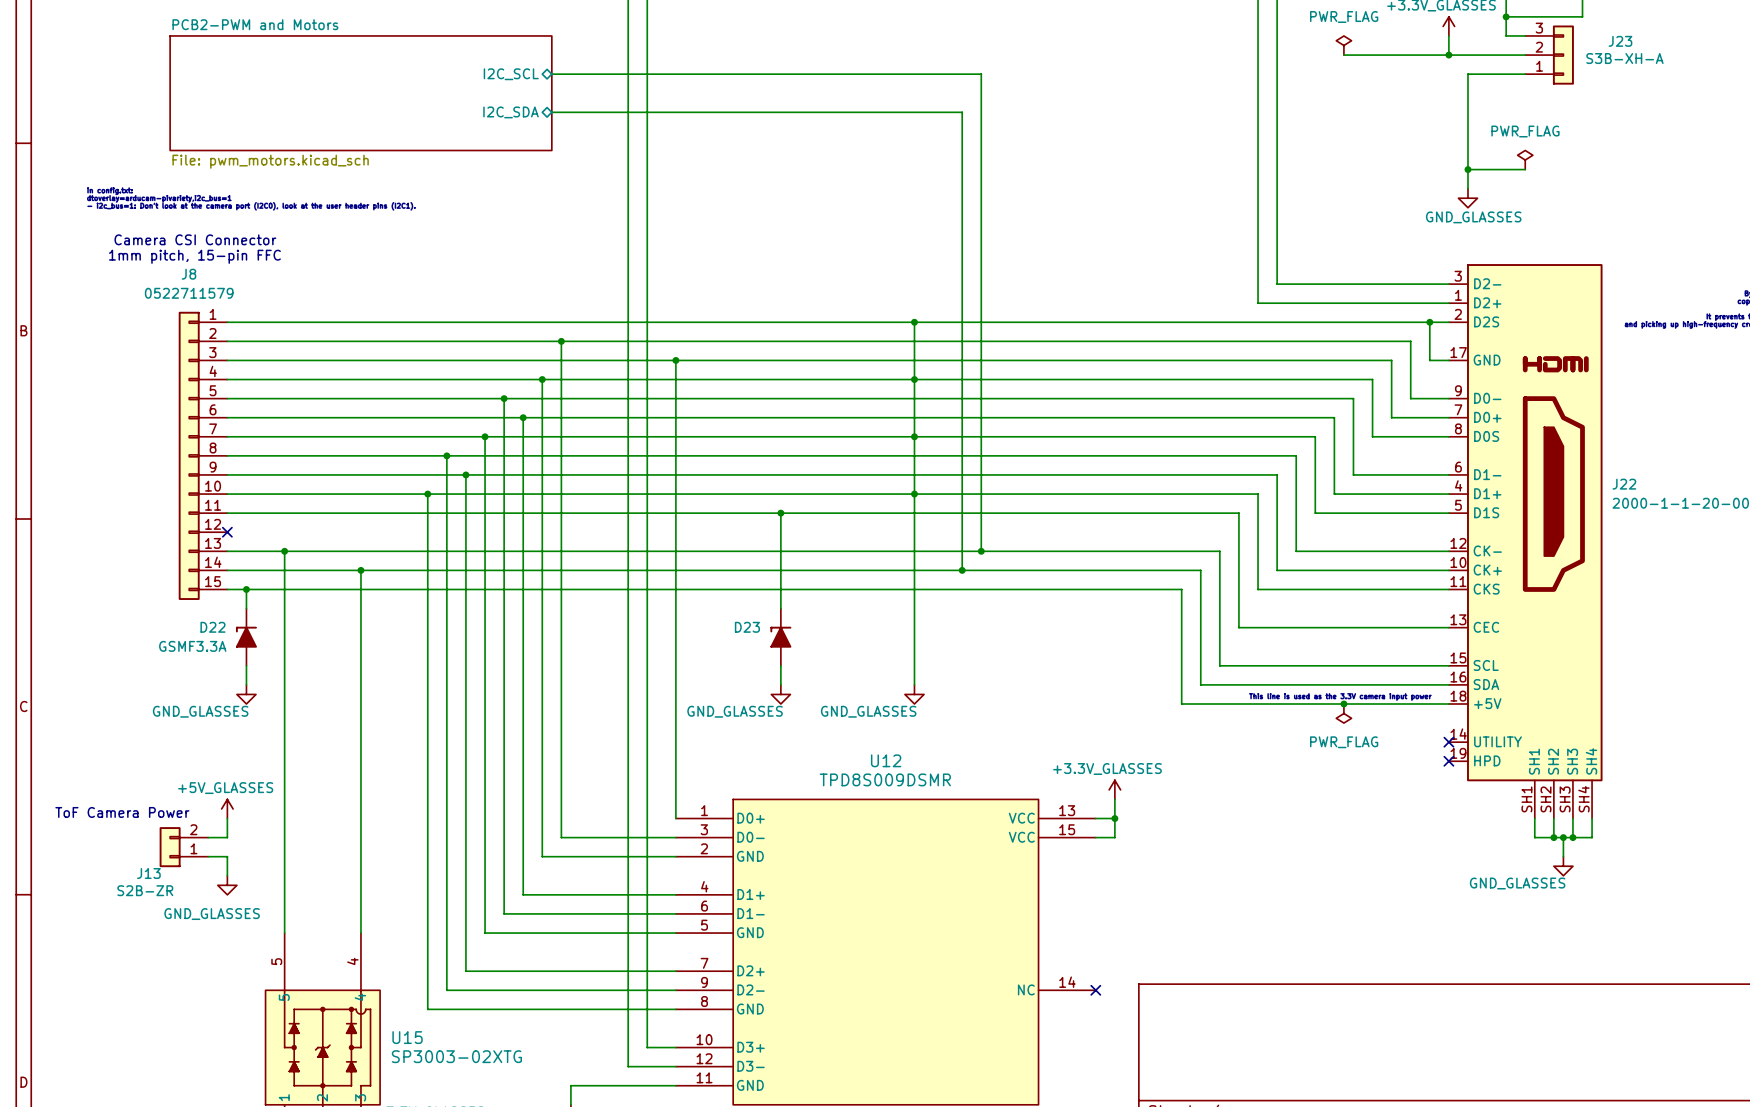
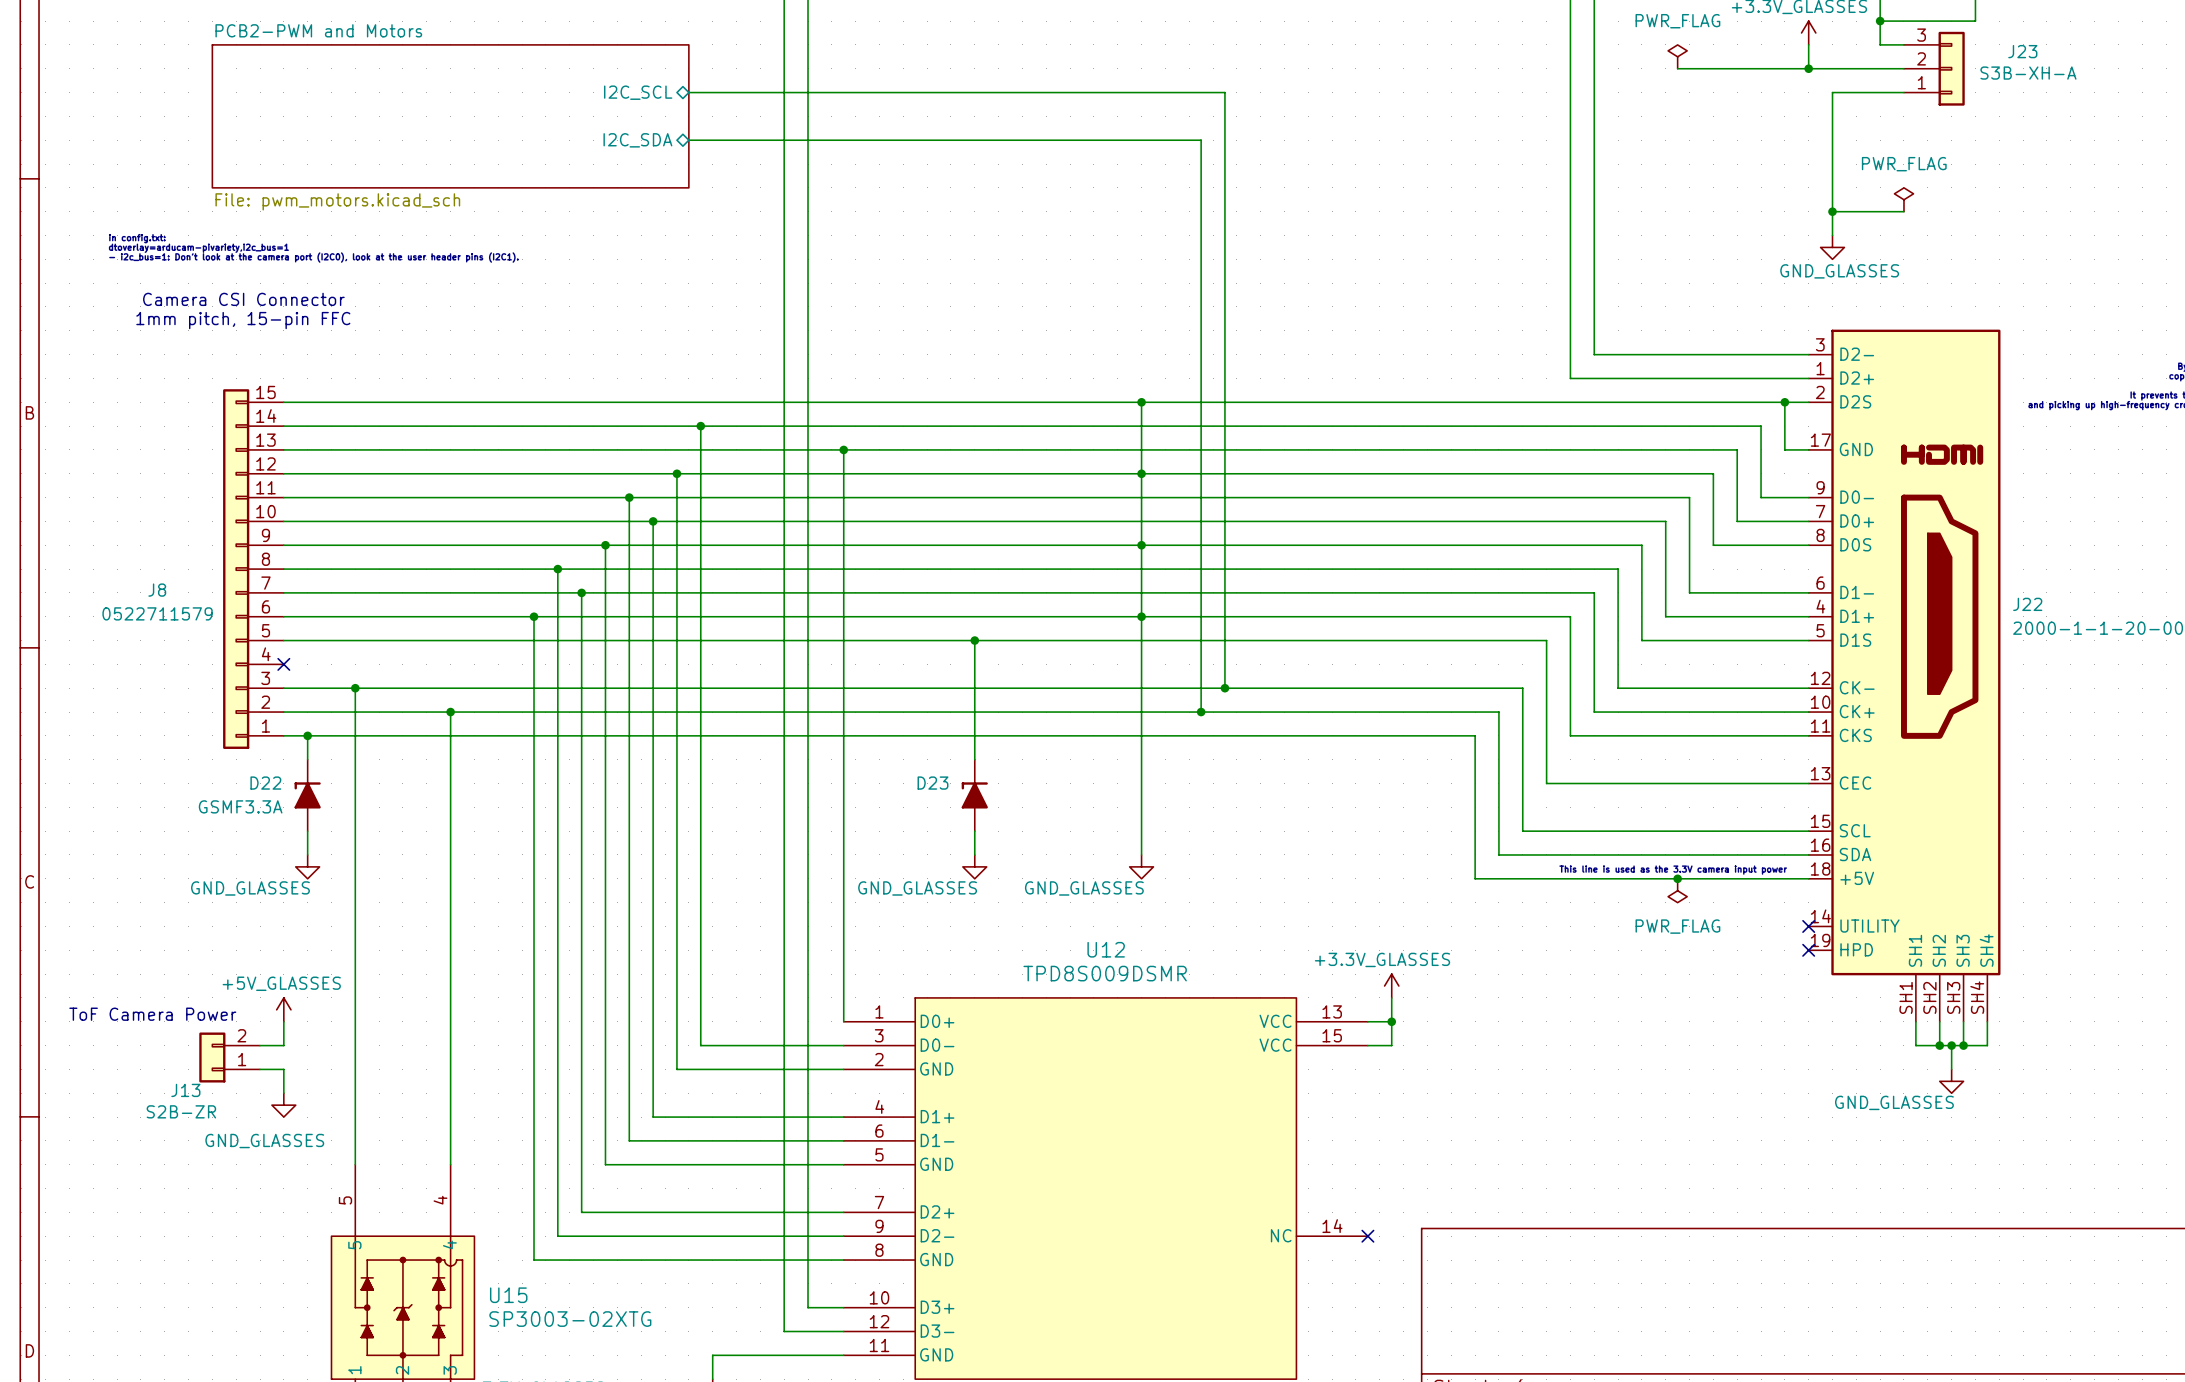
J8 name position: J8 (188, 274) -> J8 (157, 590)
J8 value position: 0522711579 (189, 293) -> 0522711579 (157, 613)
J8 flip: as is (189, 455) -> up-down (236, 569)

